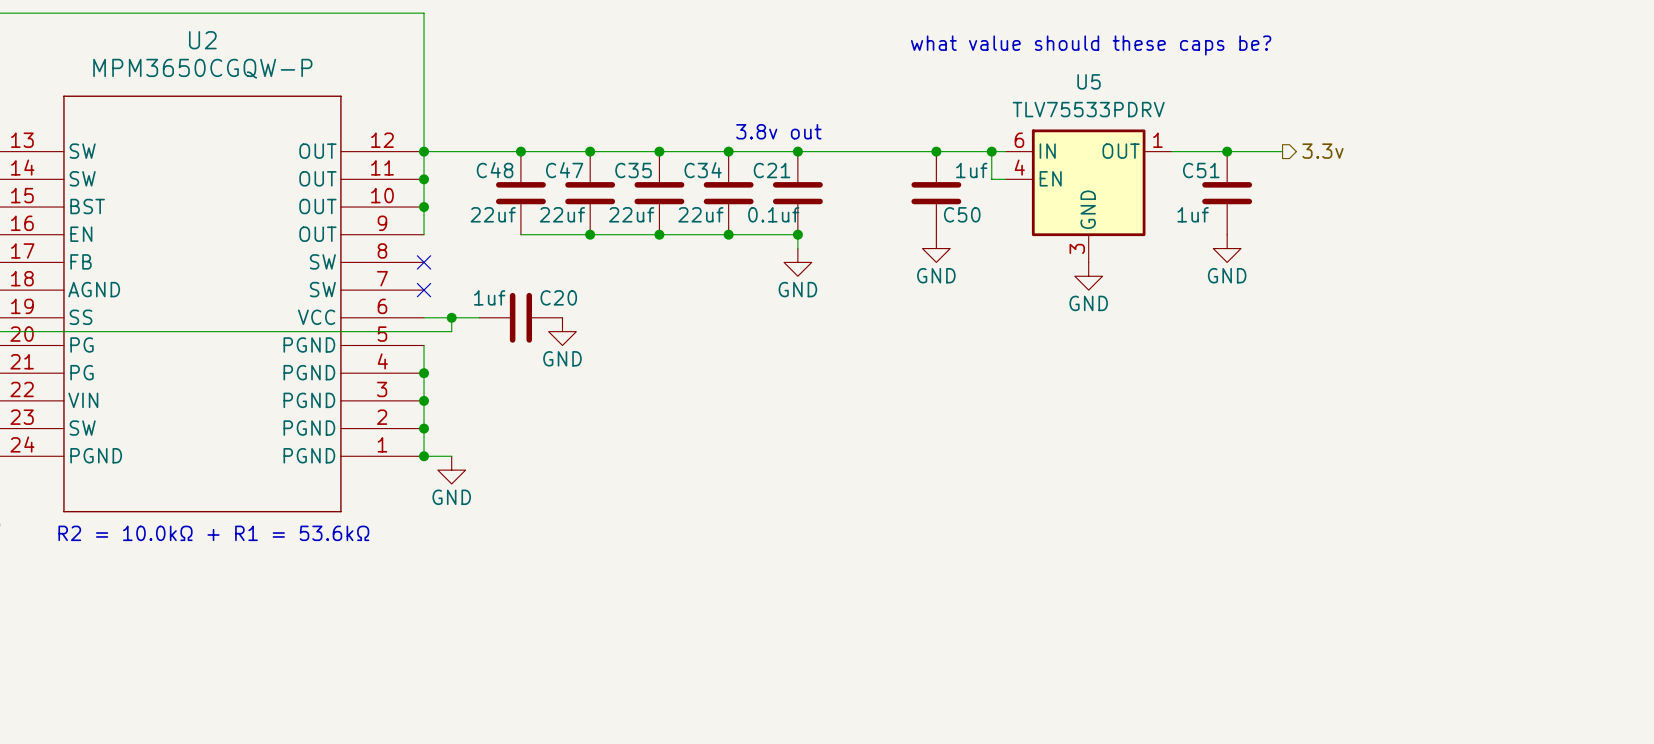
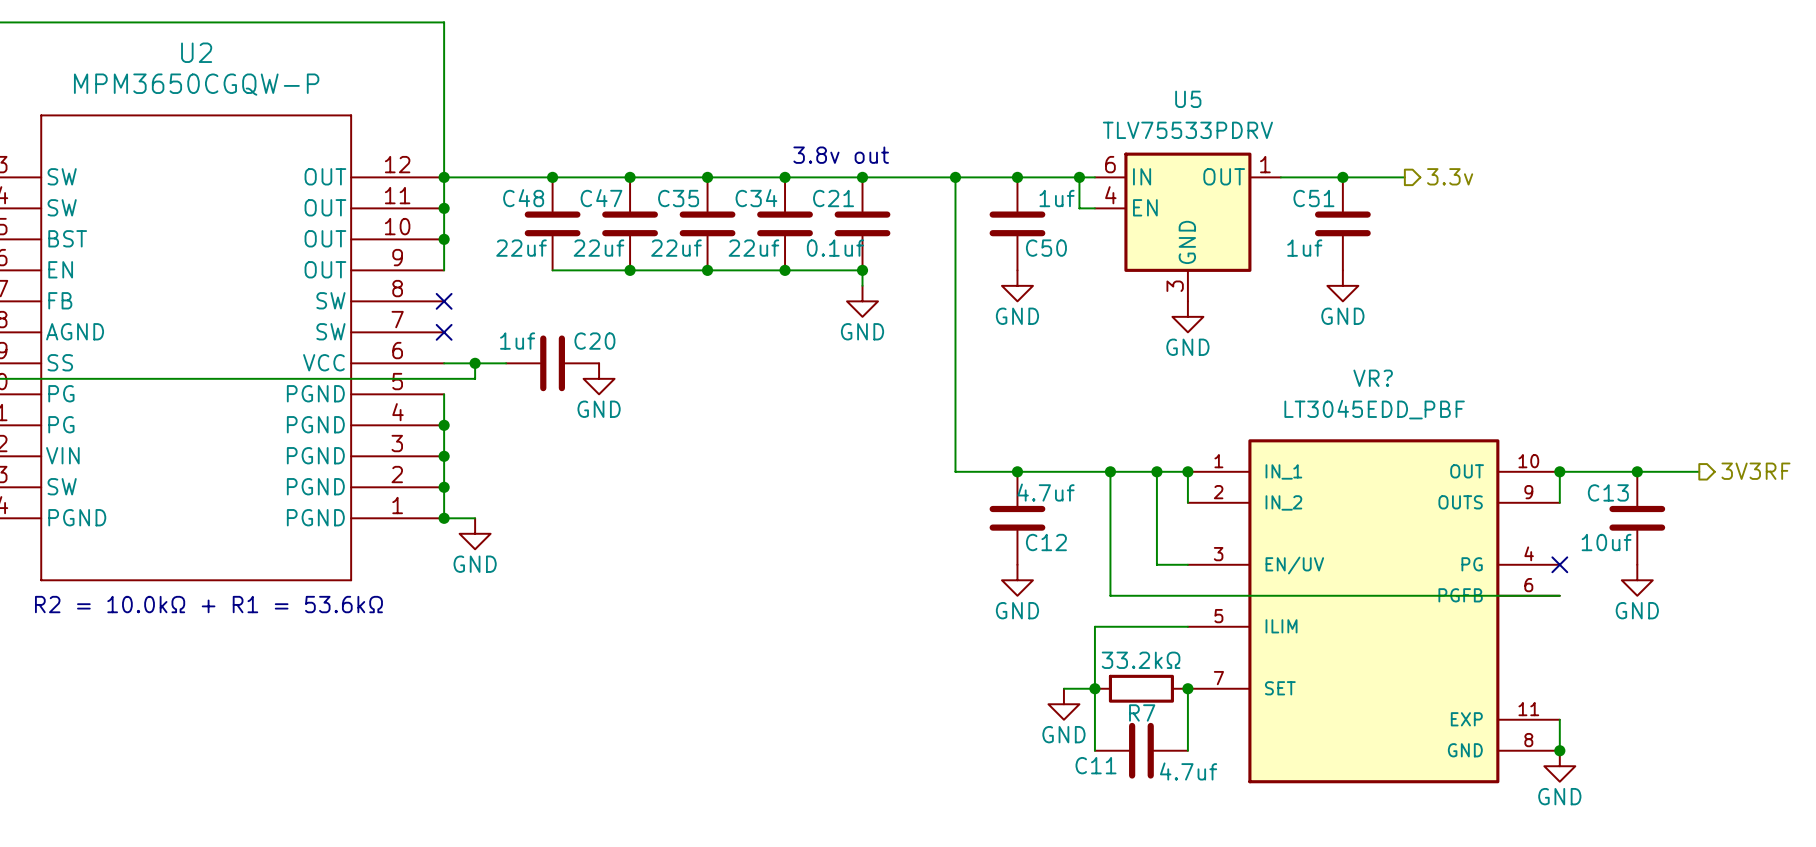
text: what value should these caps be? (1091, 45) -> none
wire: none -> (955, 177) (955, 471) (1187, 471) (1187, 502)
junction: none -> (955, 177)
junction: none -> (1017, 471)
wire: none -> (1110, 471) (1110, 595) (1559, 595)
junction: none -> (1110, 471)
wire: none -> (1156, 471) (1156, 564) (1187, 564)
junction: none -> (1156, 471)
junction: none -> (1187, 471)
junction: none -> (1559, 471)
junction: none -> (1637, 471)
wire: none -> (1699, 471) (1559, 471) (1559, 502)
hierarchical label: none -> 3V3RF (1755, 471)
C12: none -> 4.7uf (1017, 518)
C13: none -> 10uf (1637, 518)
no-connect mark: none -> (1559, 564)
power symbol: none -> GND (1017, 580)
power symbol: none -> GND (1637, 580)
VR?: none -> LT3045EDD_PBF (1373, 611)
wire: none -> (1187, 626) (1094, 626) (1094, 750)
wire: none -> (1063, 688) (1094, 688)
junction: none -> (1094, 688)
R7: none -> 33.2kΩ (1141, 688)
wire: none -> (1187, 688) (1187, 750)
junction: none -> (1187, 688)
power symbol: none -> GND (1063, 704)
wire: none -> (1559, 719) (1559, 750)
C11: none -> 4.7uf (1141, 750)
junction: none -> (1559, 750)
power symbol: none -> GND (1559, 766)

